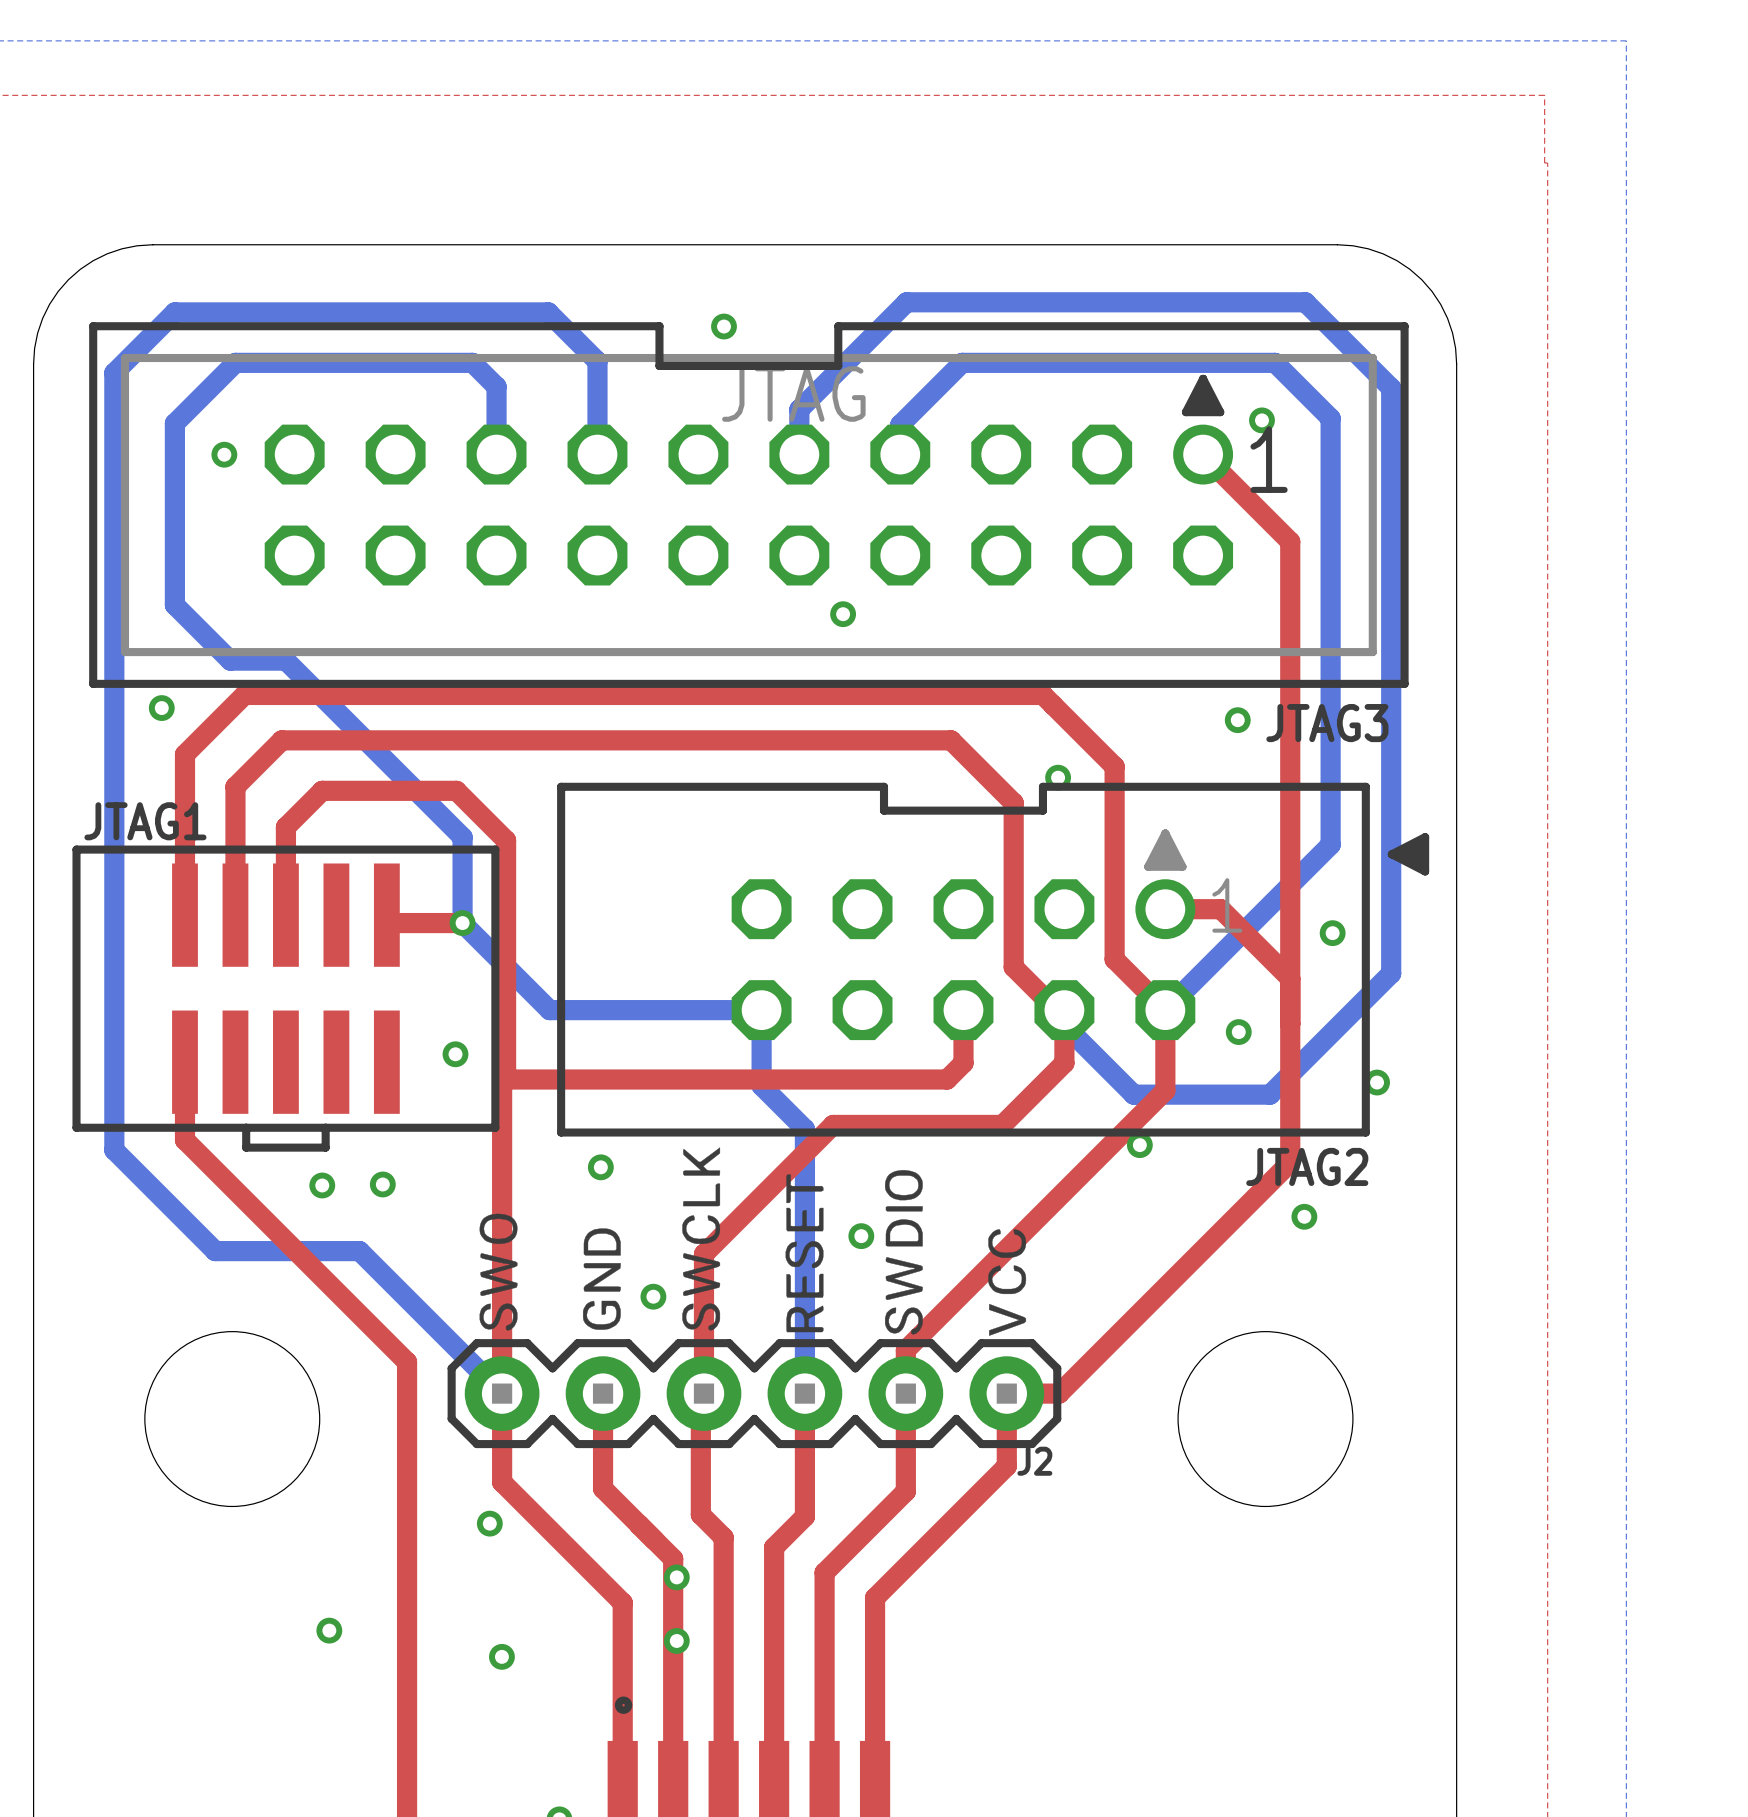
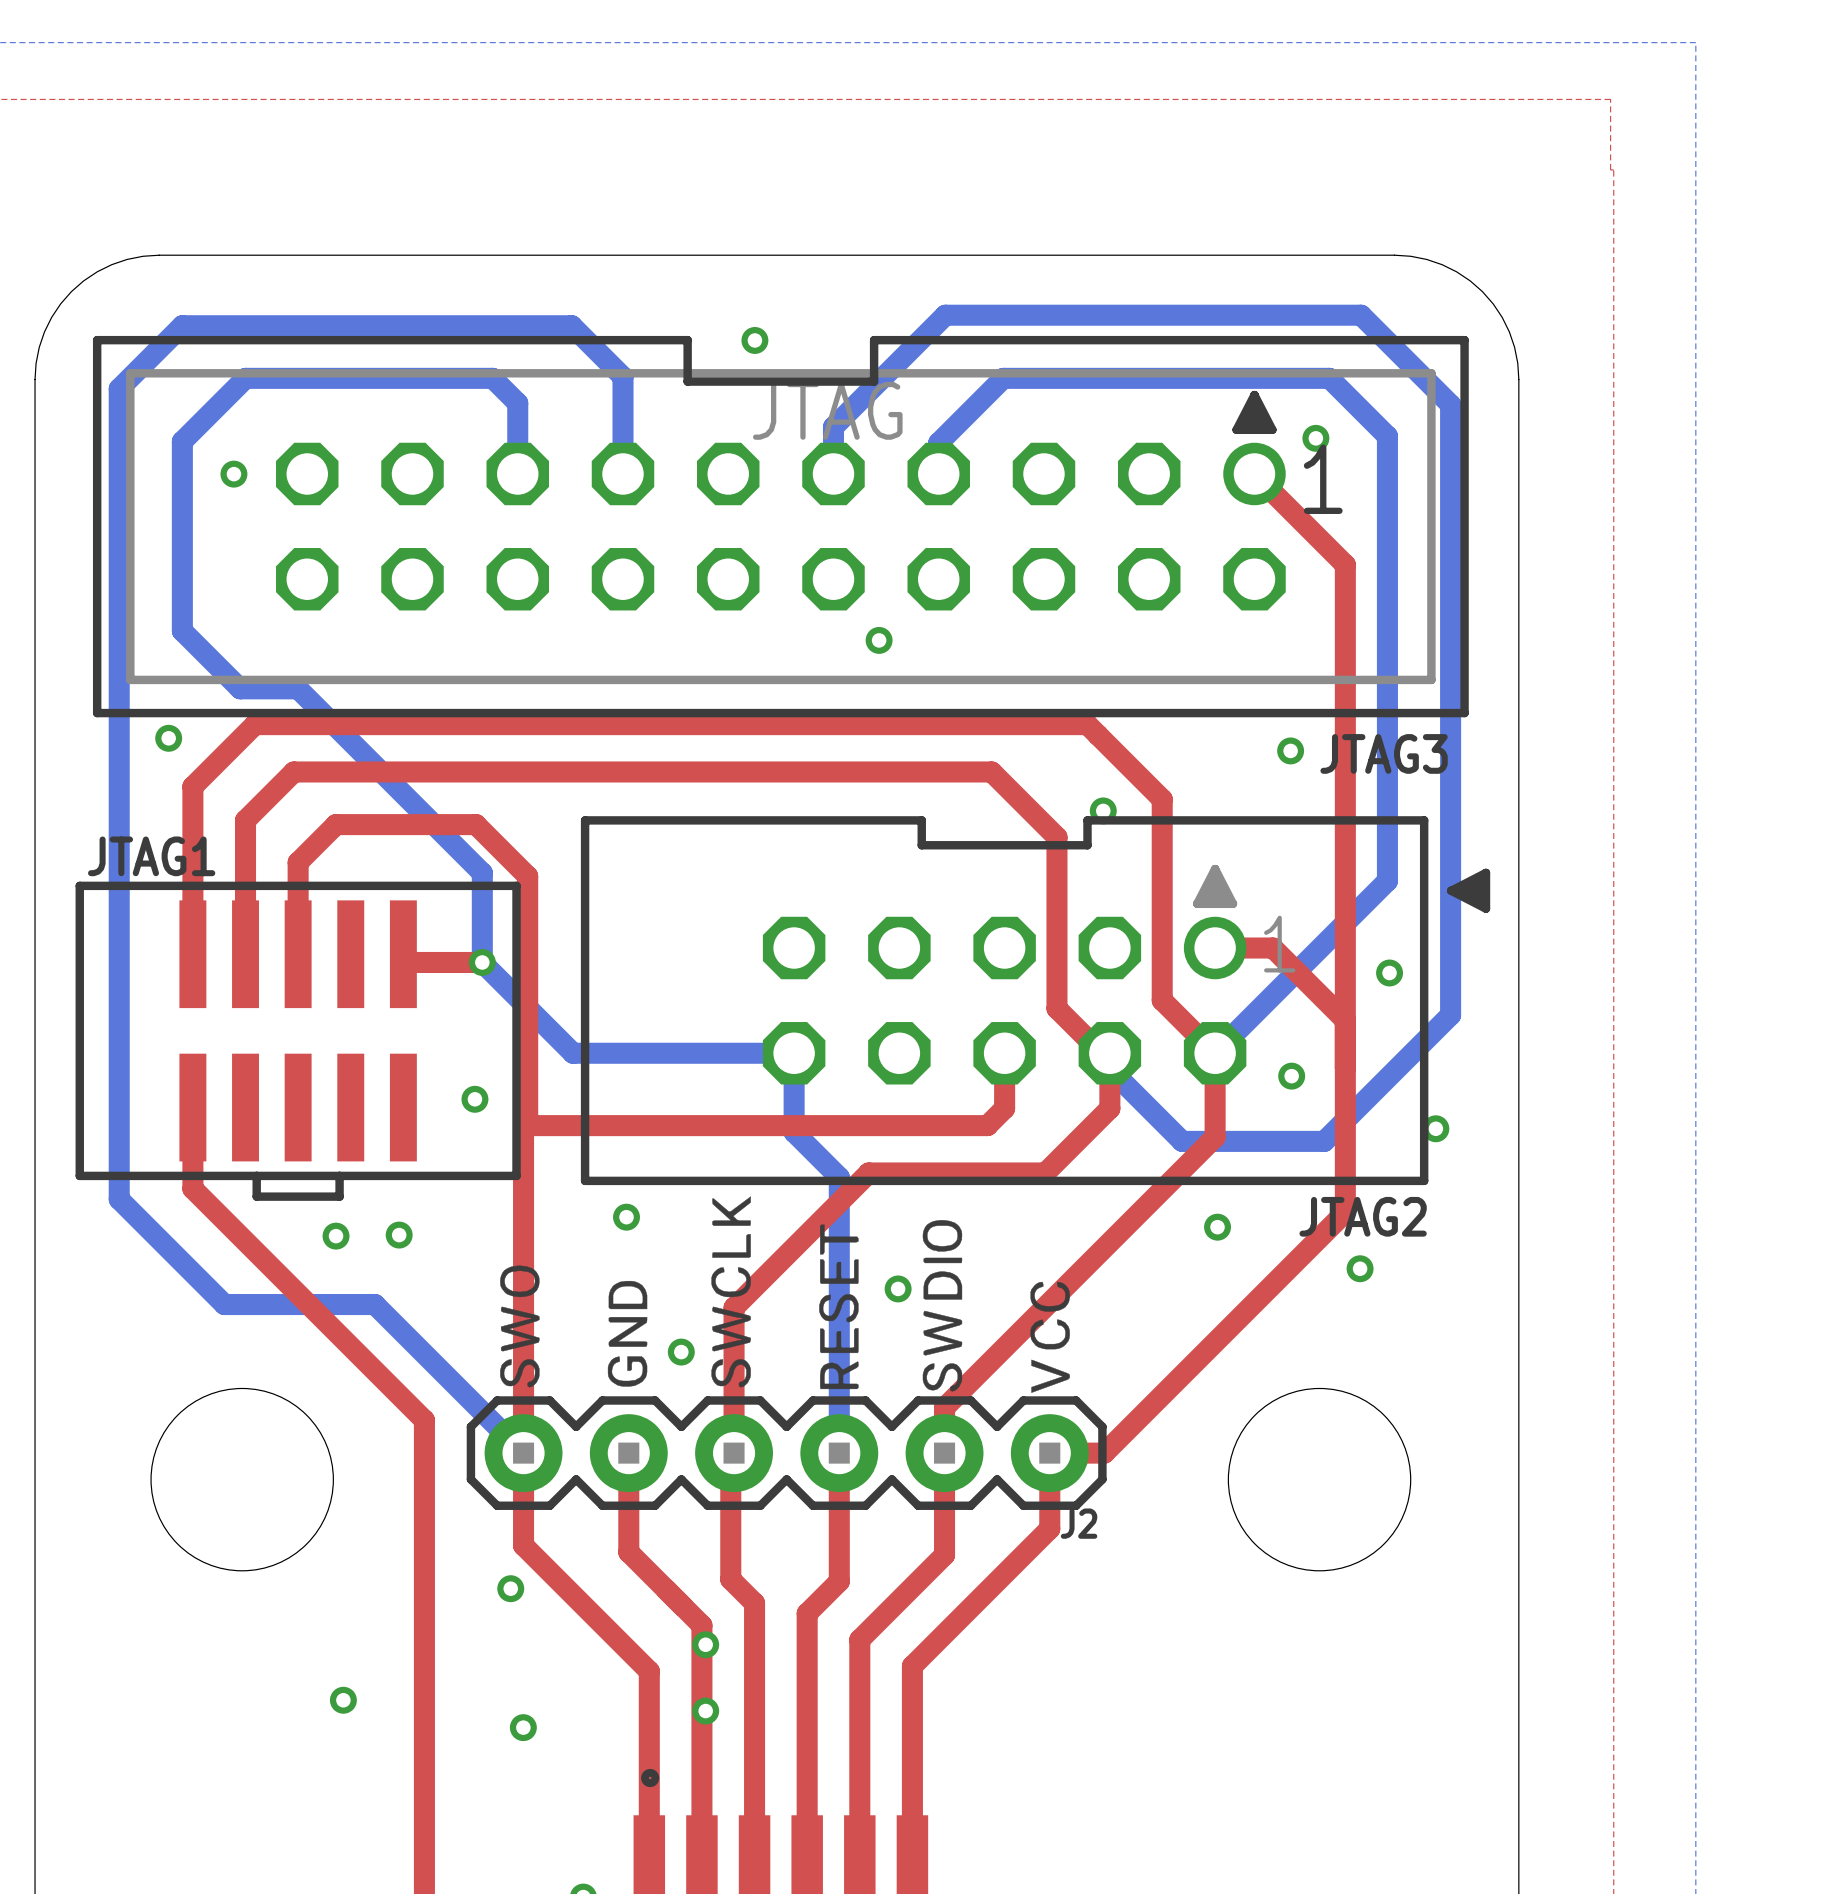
via position: (1139, 1145) -> (1217, 1227)

